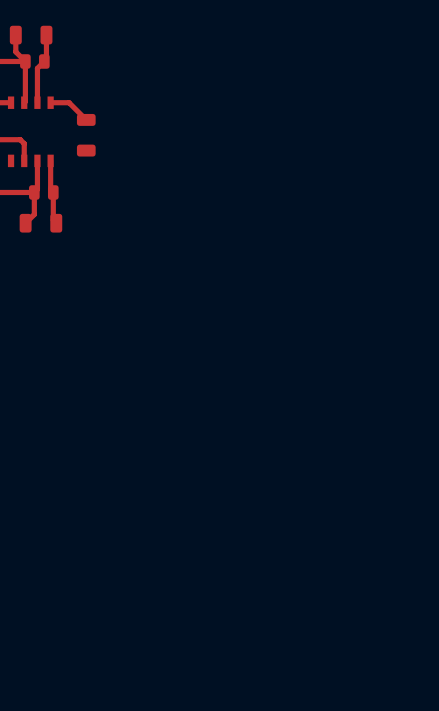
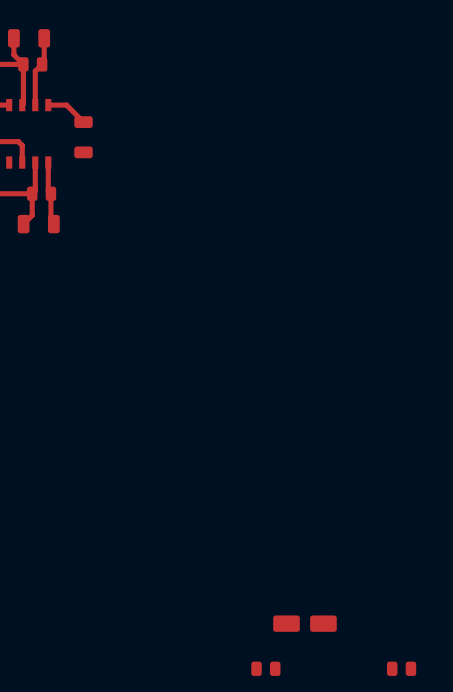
part: none -> (304, 623)
part: none -> (265, 668)
part: none -> (401, 668)

